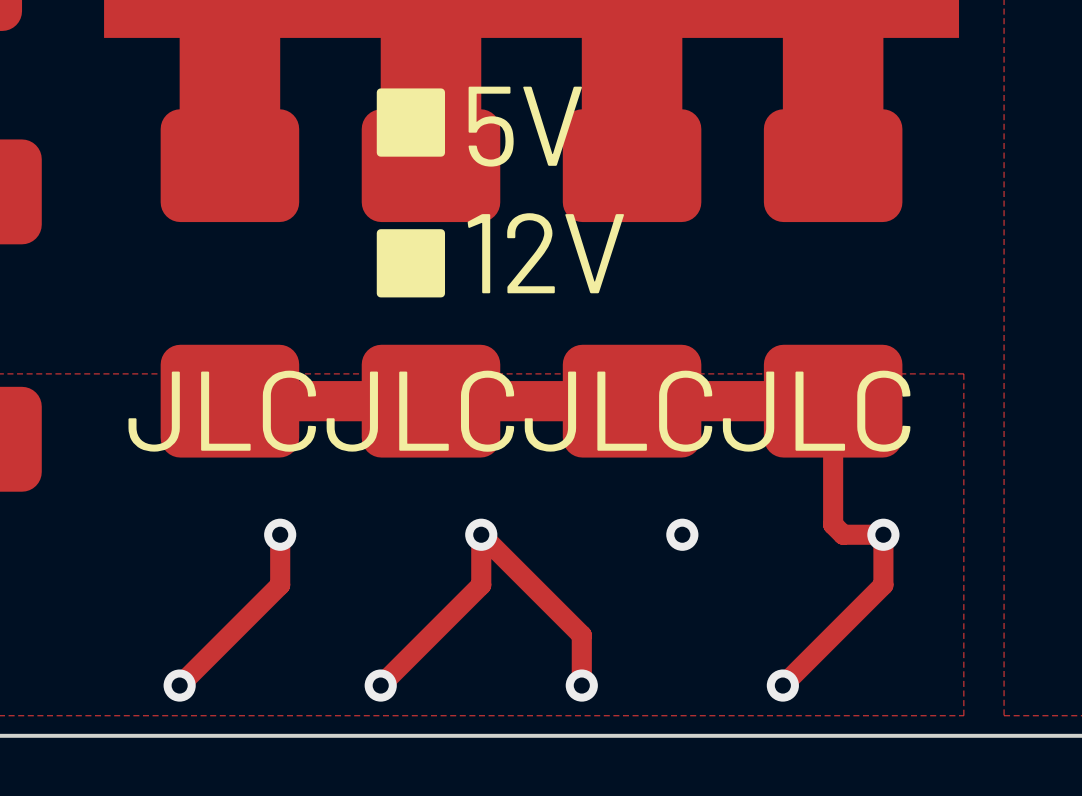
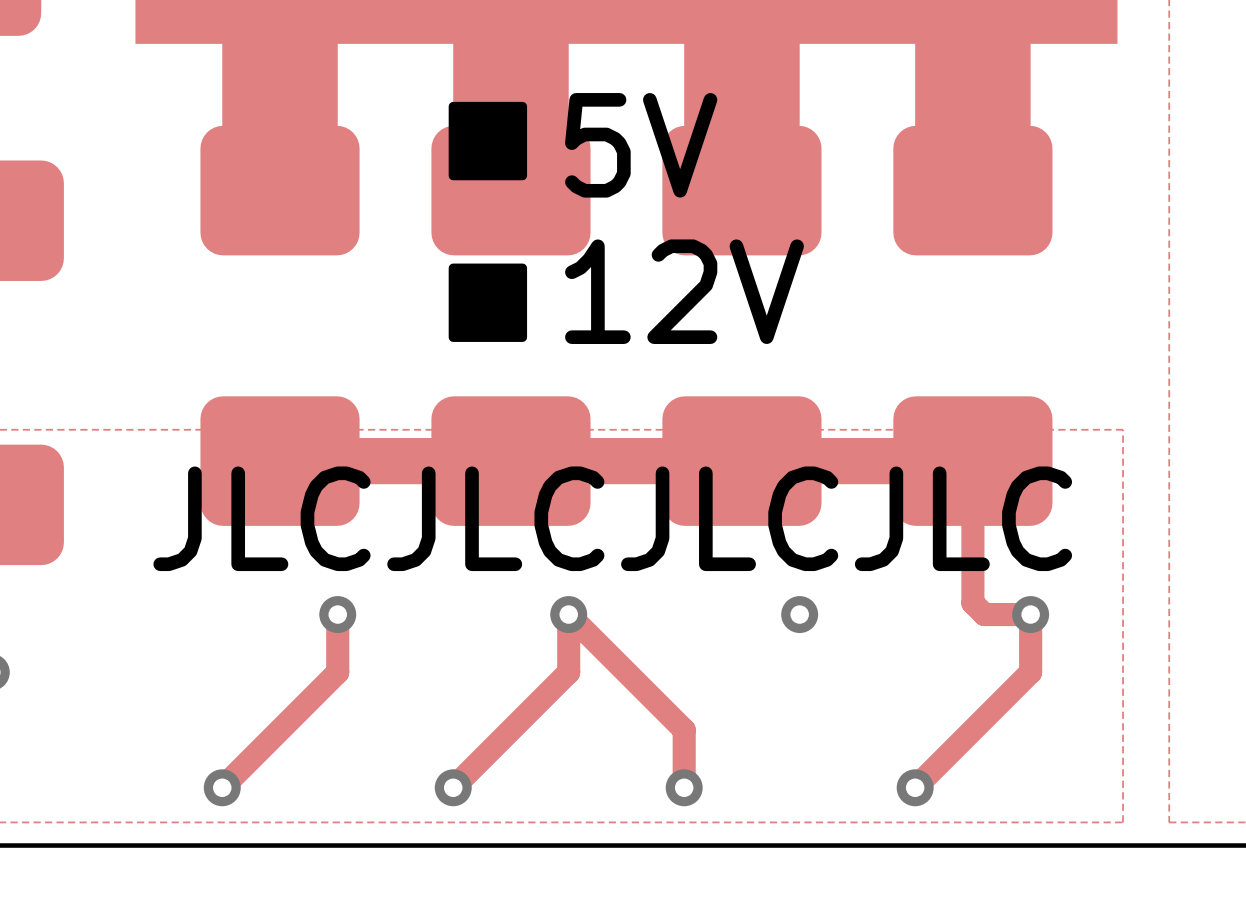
text position: JLCJLCJLCJLC (519, 411) -> JLCJLCJLCJLC (612, 518)

